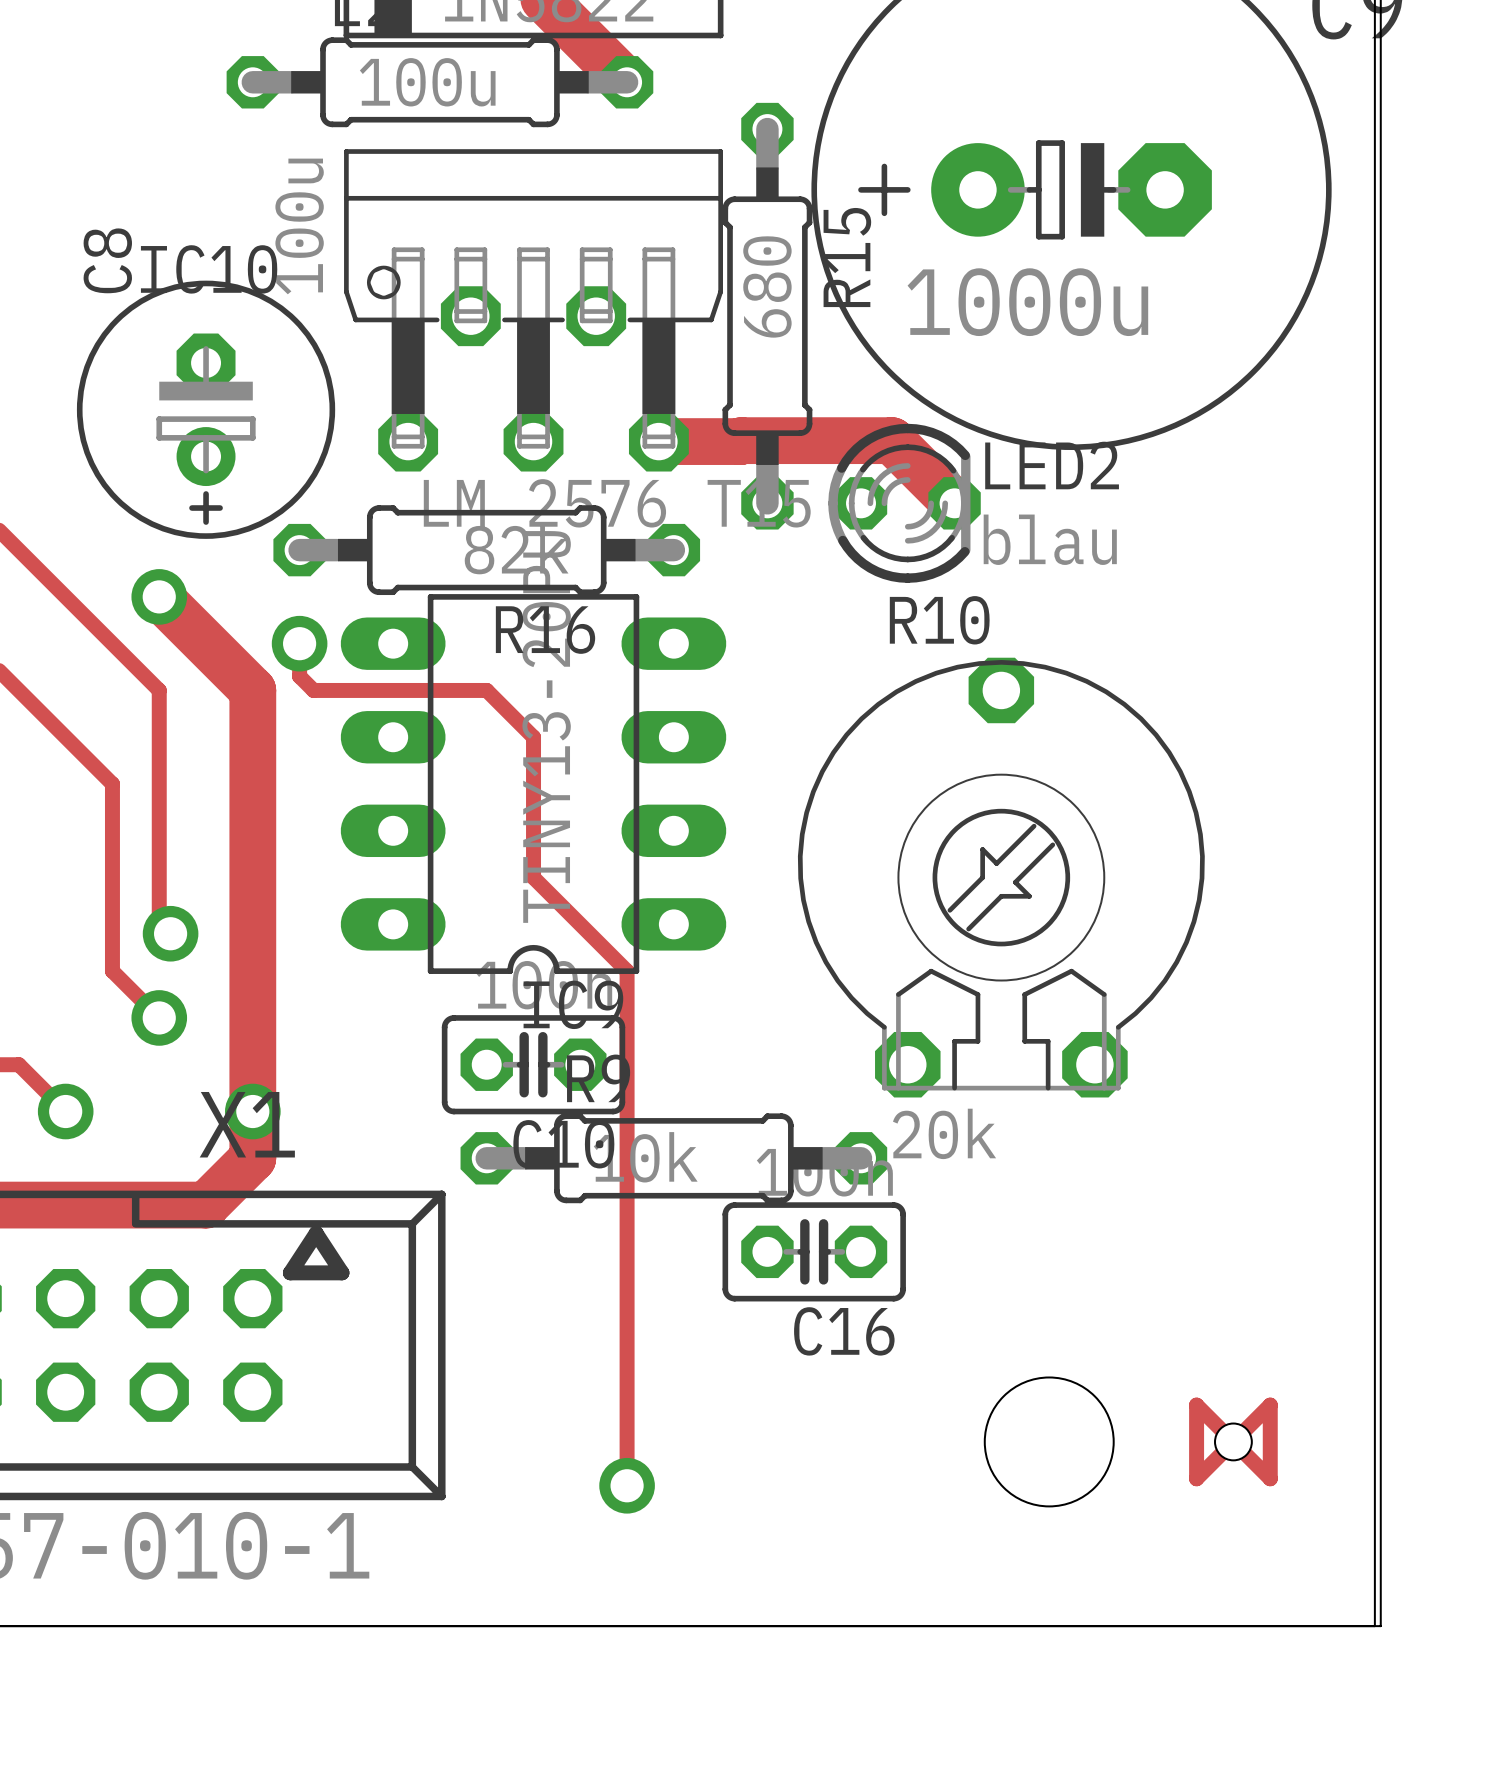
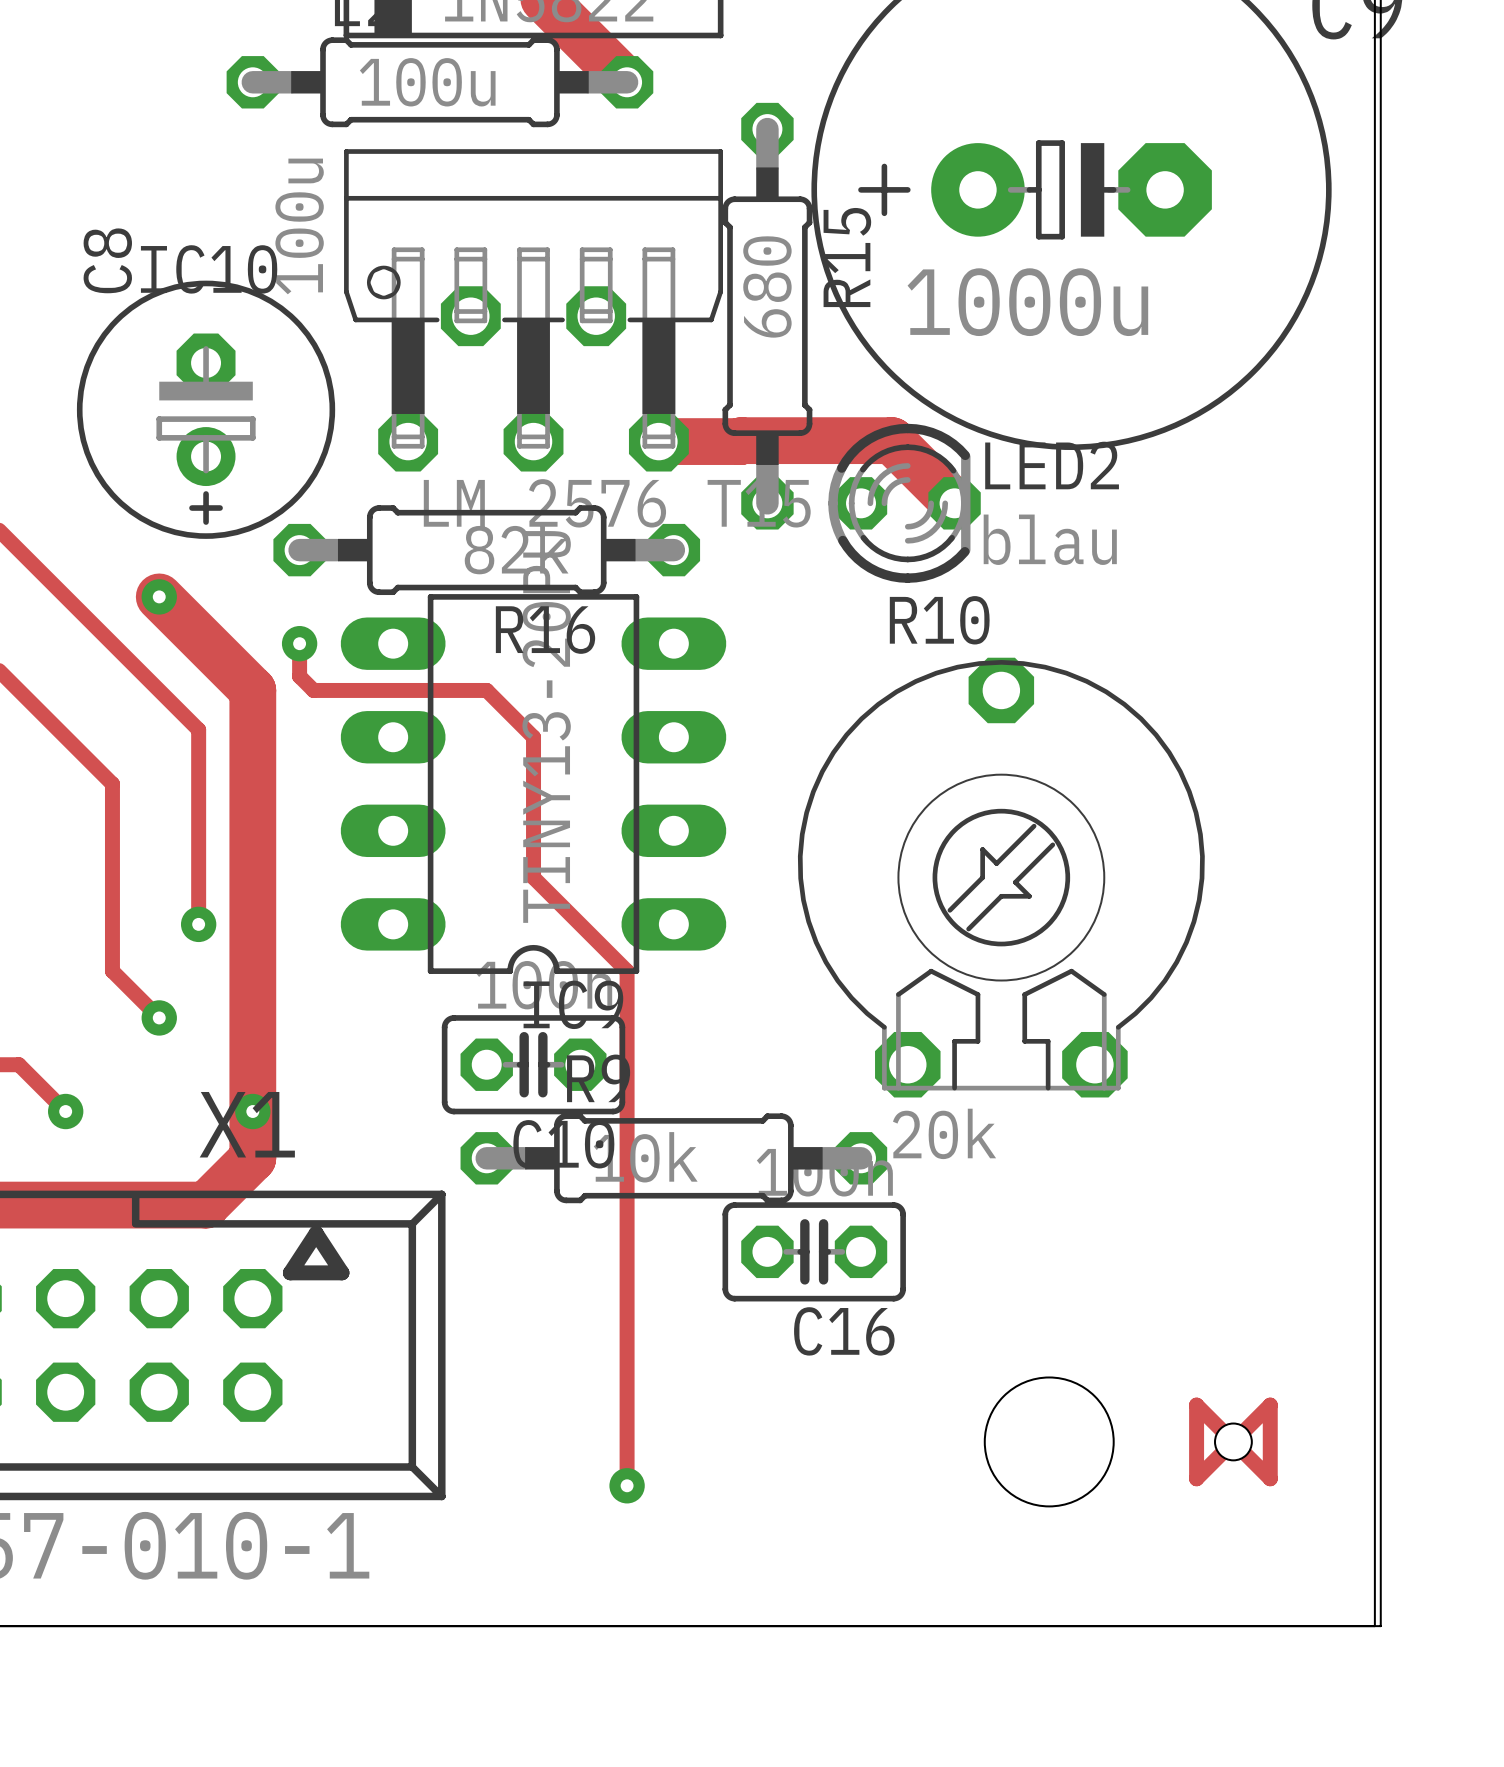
via size: [131, 569, 188, 625] -> [141, 579, 177, 615]
via size: [271, 615, 328, 672] -> [281, 626, 318, 662]
track: (159, 690) (159, 922) (170, 933) -> (159, 690) (198, 729) (198, 924)
via size: [142, 905, 199, 962] -> [180, 906, 217, 943]
via size: [131, 990, 188, 1046] -> [141, 1000, 177, 1036]
via size: [37, 1083, 94, 1140] -> [48, 1093, 84, 1130]
via size: [225, 1083, 281, 1140] -> [235, 1093, 271, 1130]
via size: [599, 1457, 655, 1514] -> [609, 1468, 645, 1504]

